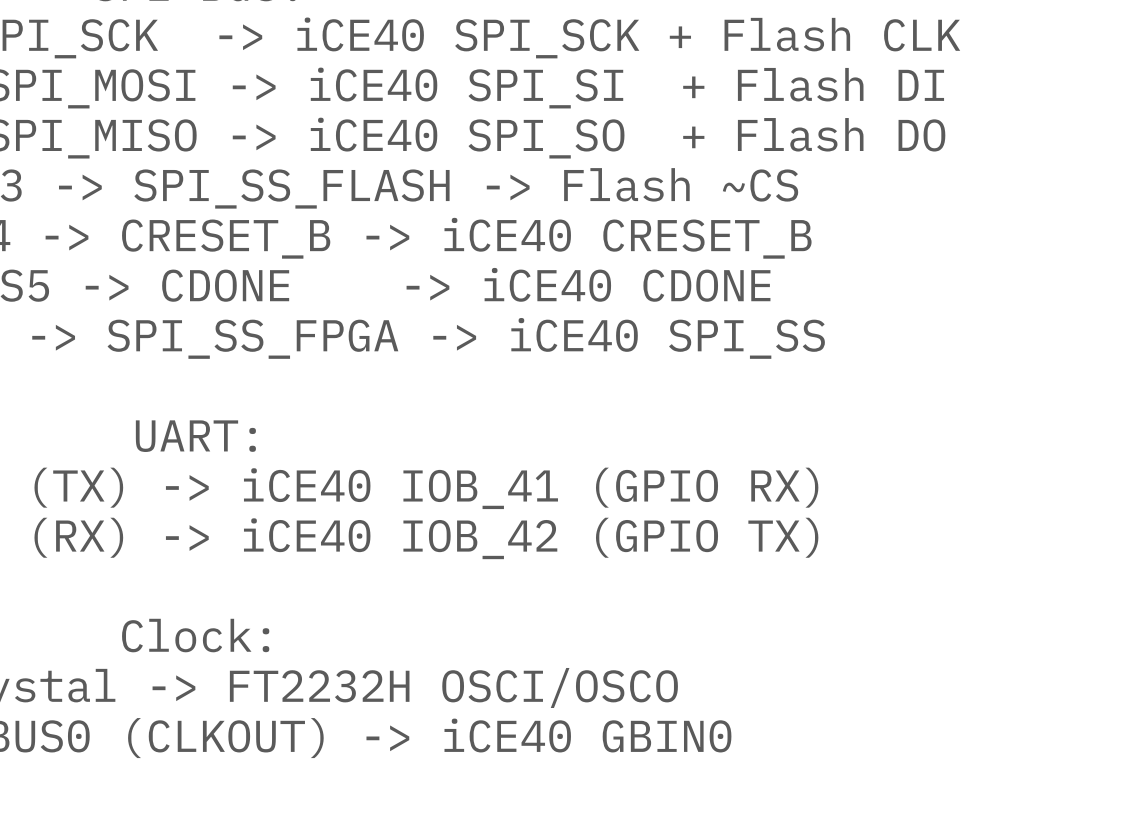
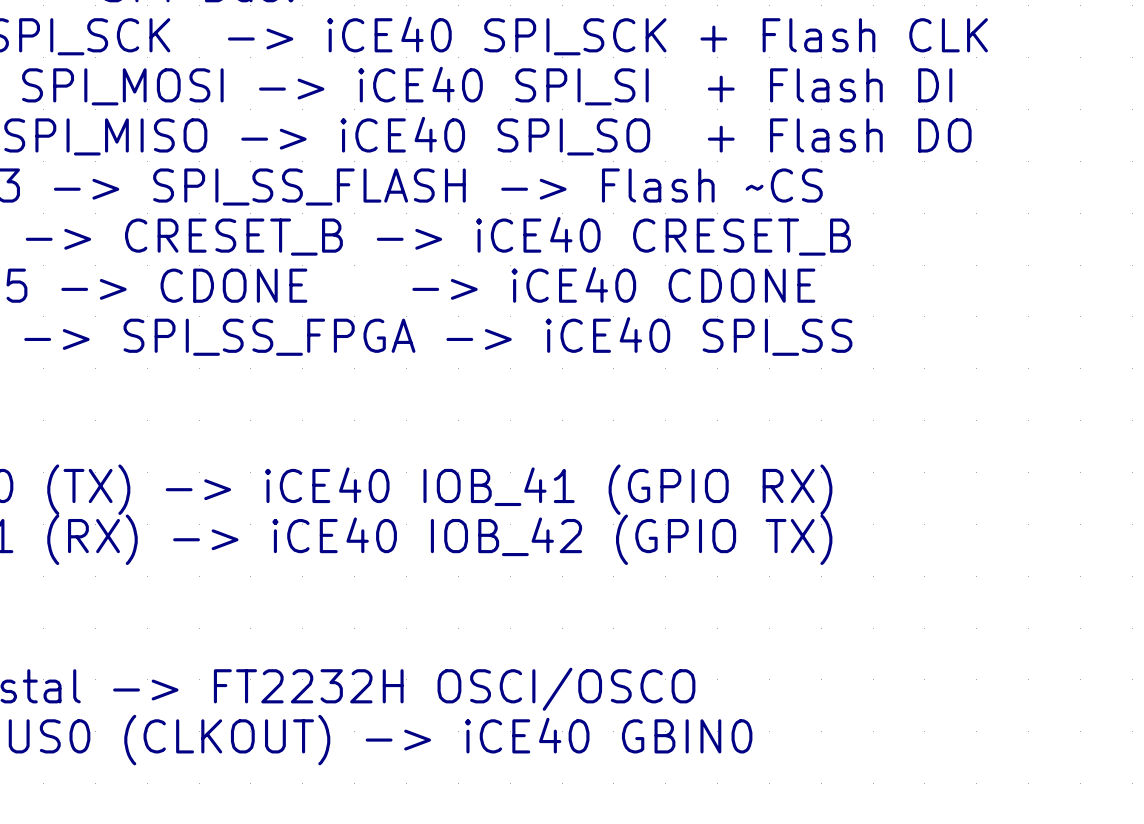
text: UART: (195, 436) -> none
text: Clock: (195, 635) -> none

